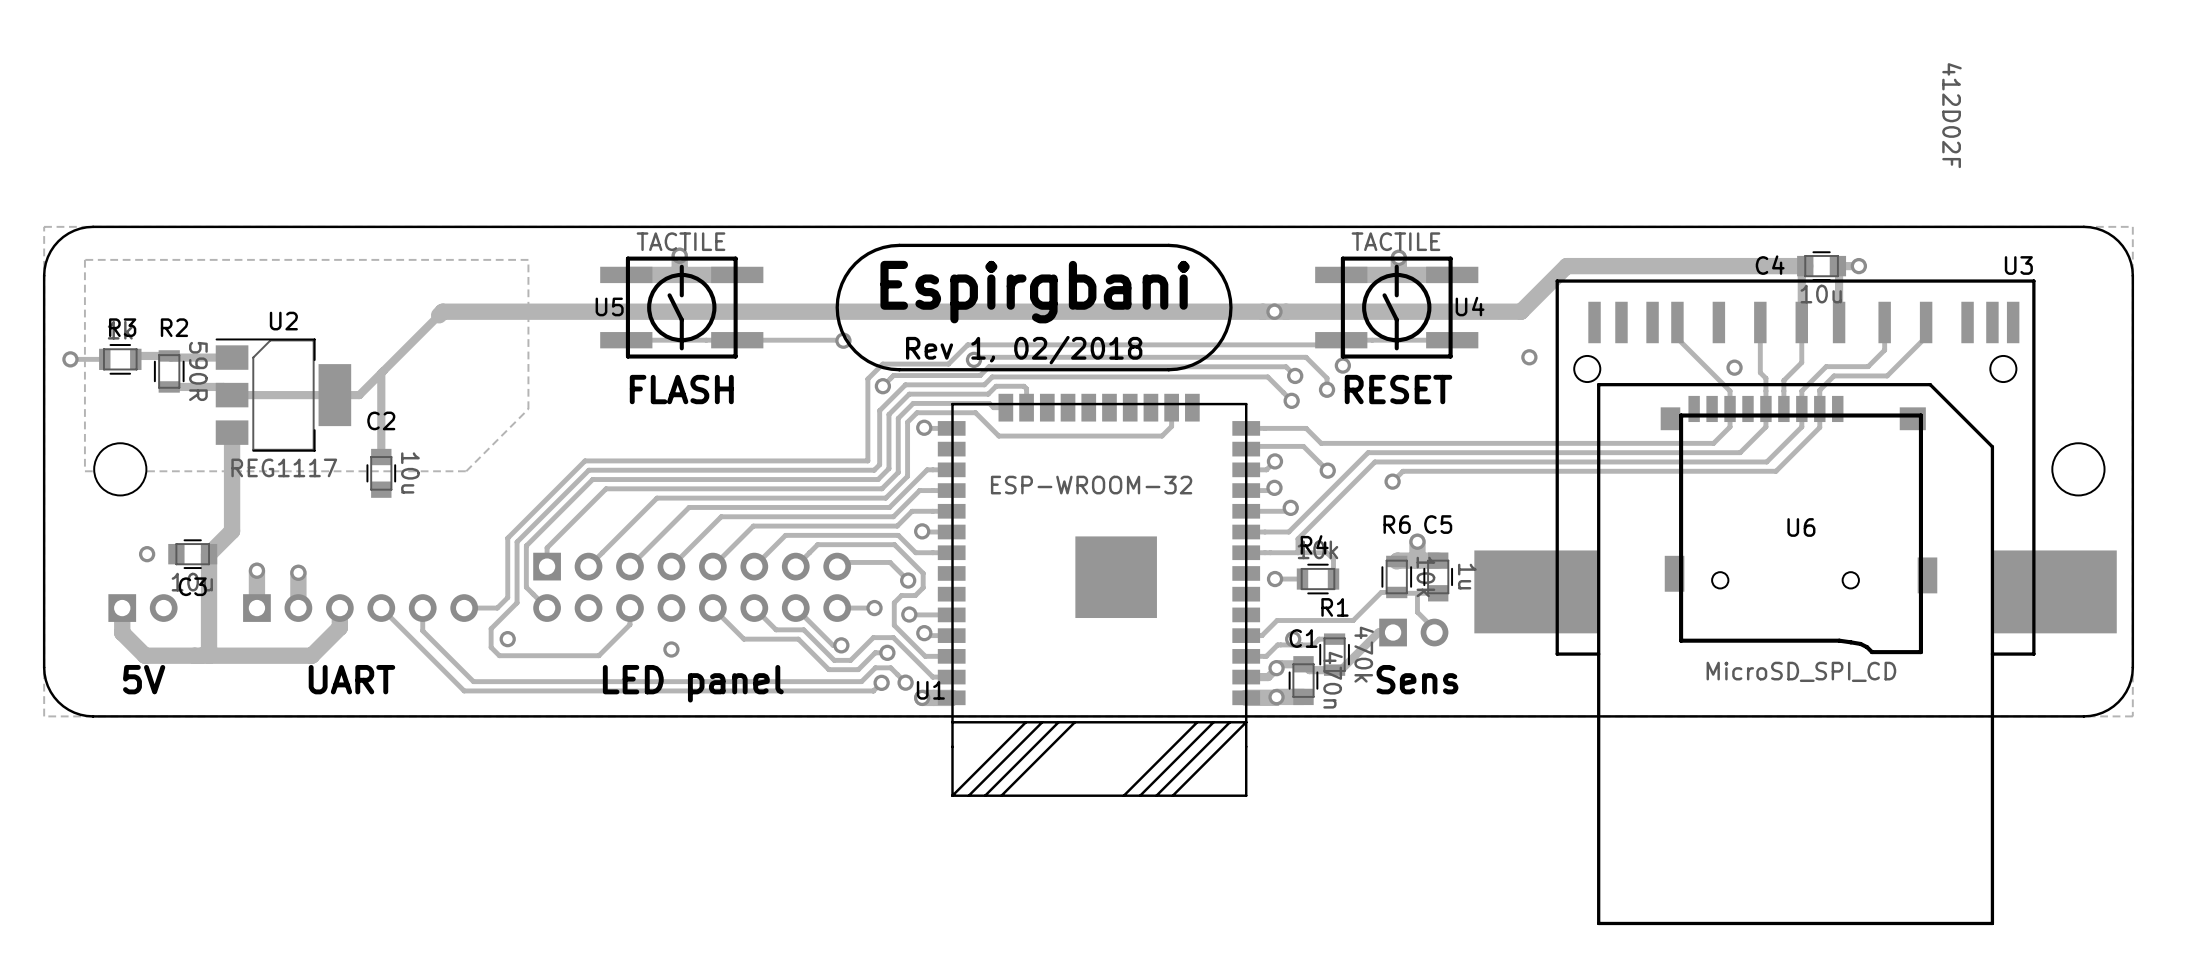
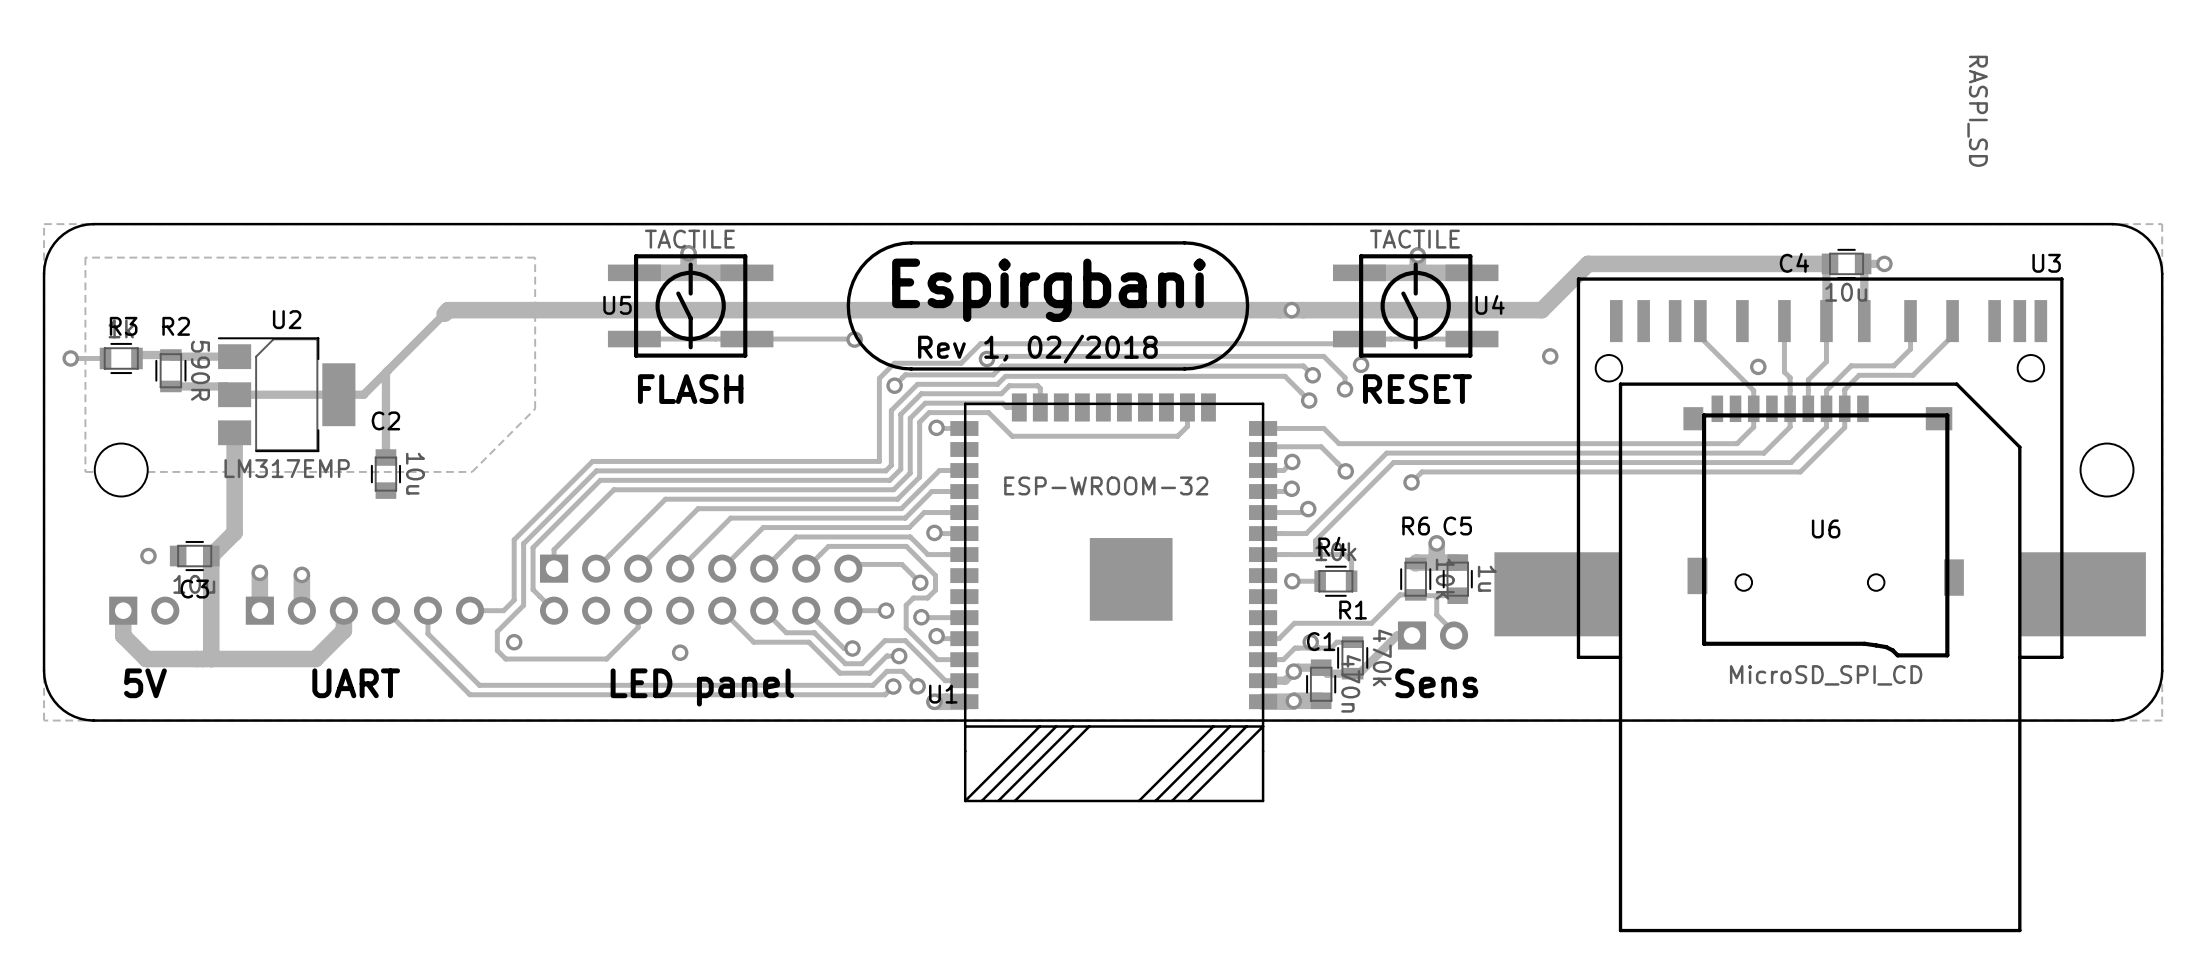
U3 value: 412D02F (1951, 115) -> RASPI_SD (1977, 111)
U2 value: REG1117 (284, 467) -> LM317EMP (287, 468)

